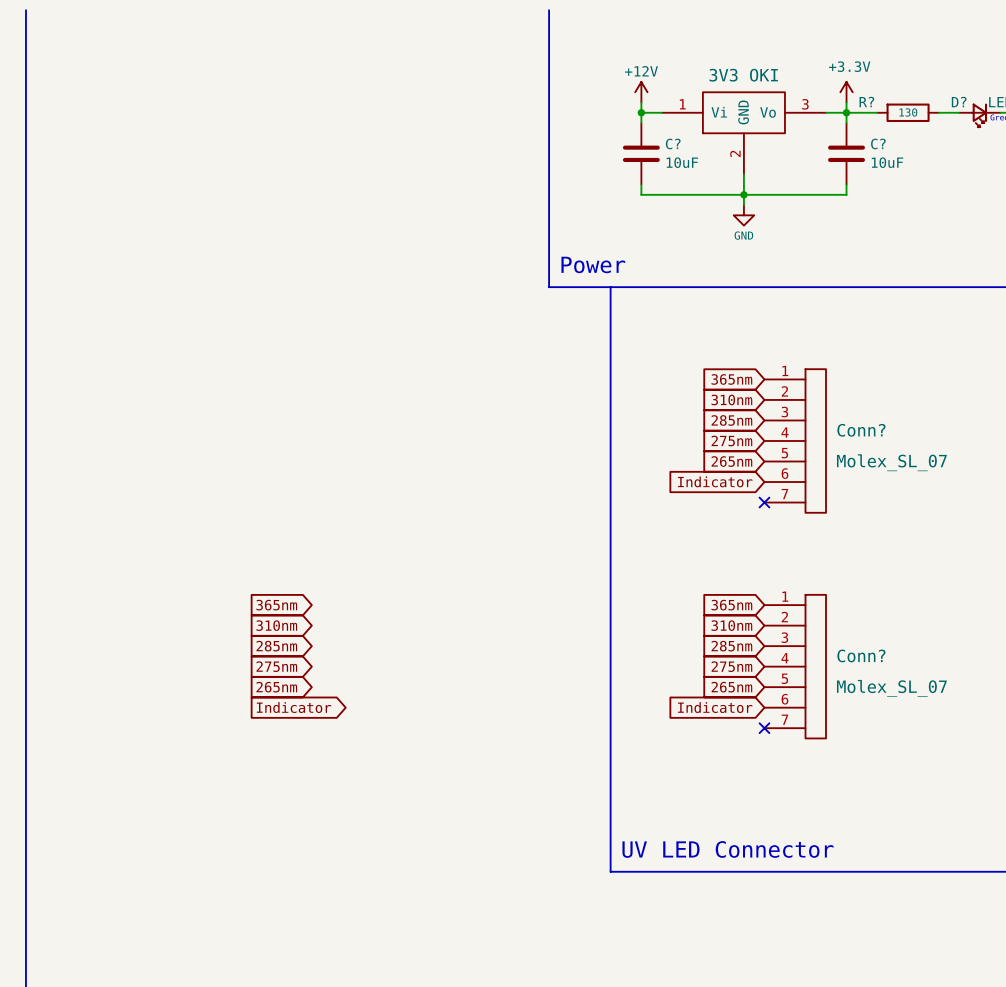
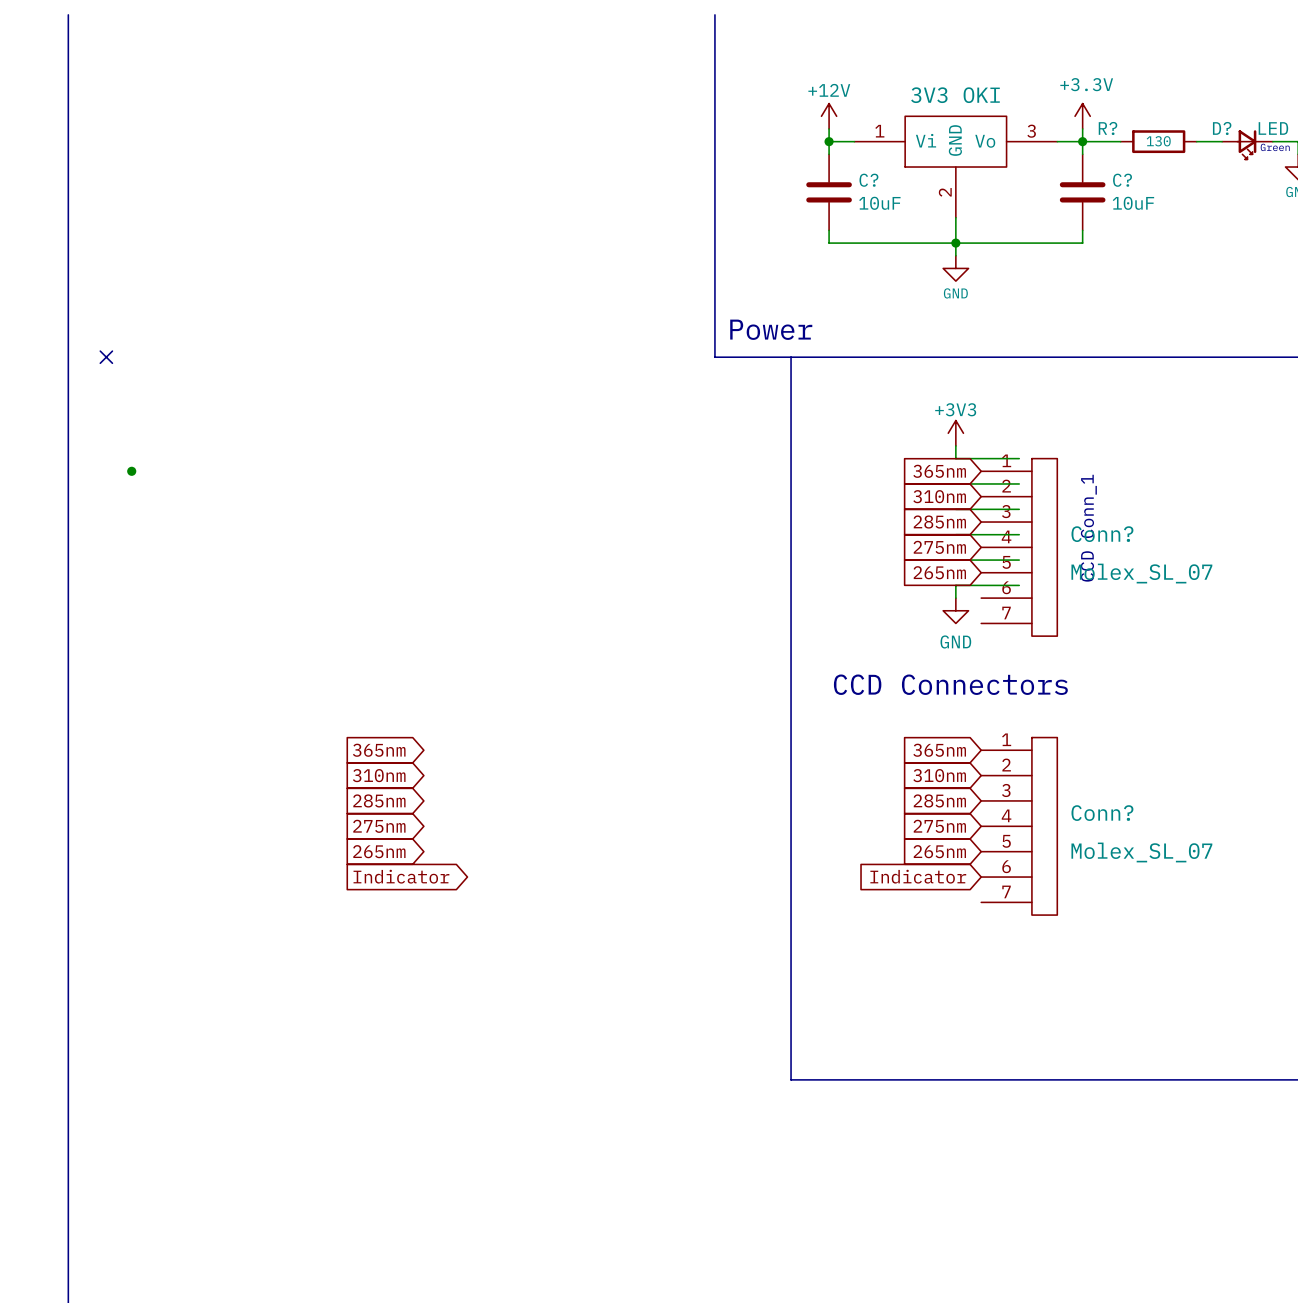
no-connect mark: none -> (106, 357)
power symbol: none -> +3V3 (955, 433)
wire: none -> (955, 445) (955, 458) (1019, 458)
junction: none -> (131, 471)
wire: none -> (955, 483) (1019, 483)
wire: none -> (955, 509) (1019, 509)
text: none -> CCD Conn_1 (1088, 528)
wire: none -> (955, 534) (1019, 534)
wire: none -> (955, 560) (1019, 560)
wire: none -> (1019, 585) (955, 585) (955, 598)
global label: Indicator (715, 481) -> none
power symbol: none -> GND (955, 610)
no-connect mark: (764, 502) -> none
text: none -> CCD Connectors (950, 684)
no-connect mark: (764, 728) -> none
text: UV LED Connector (727, 849) -> none

